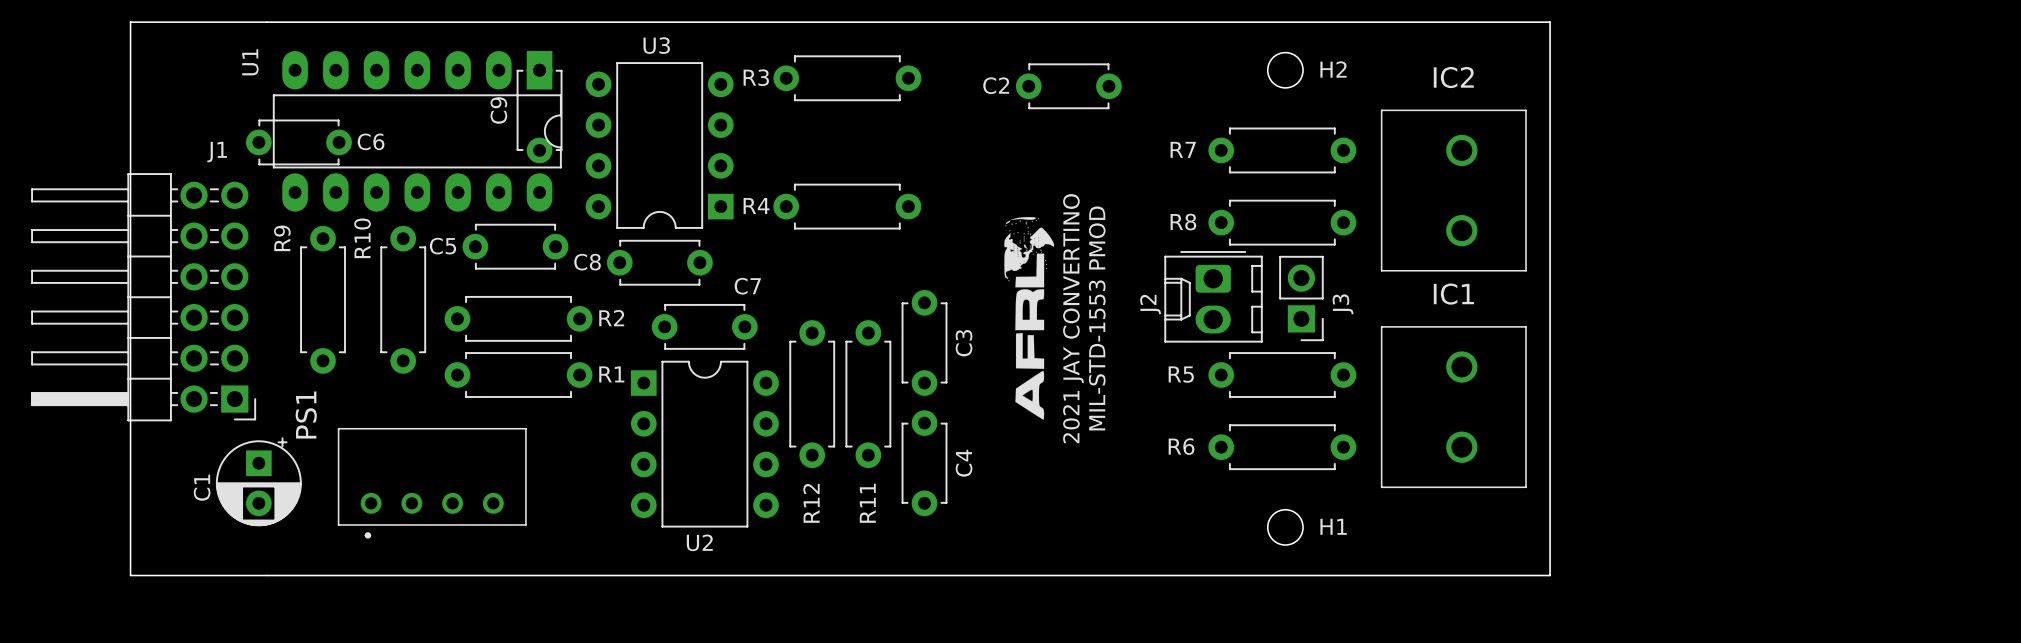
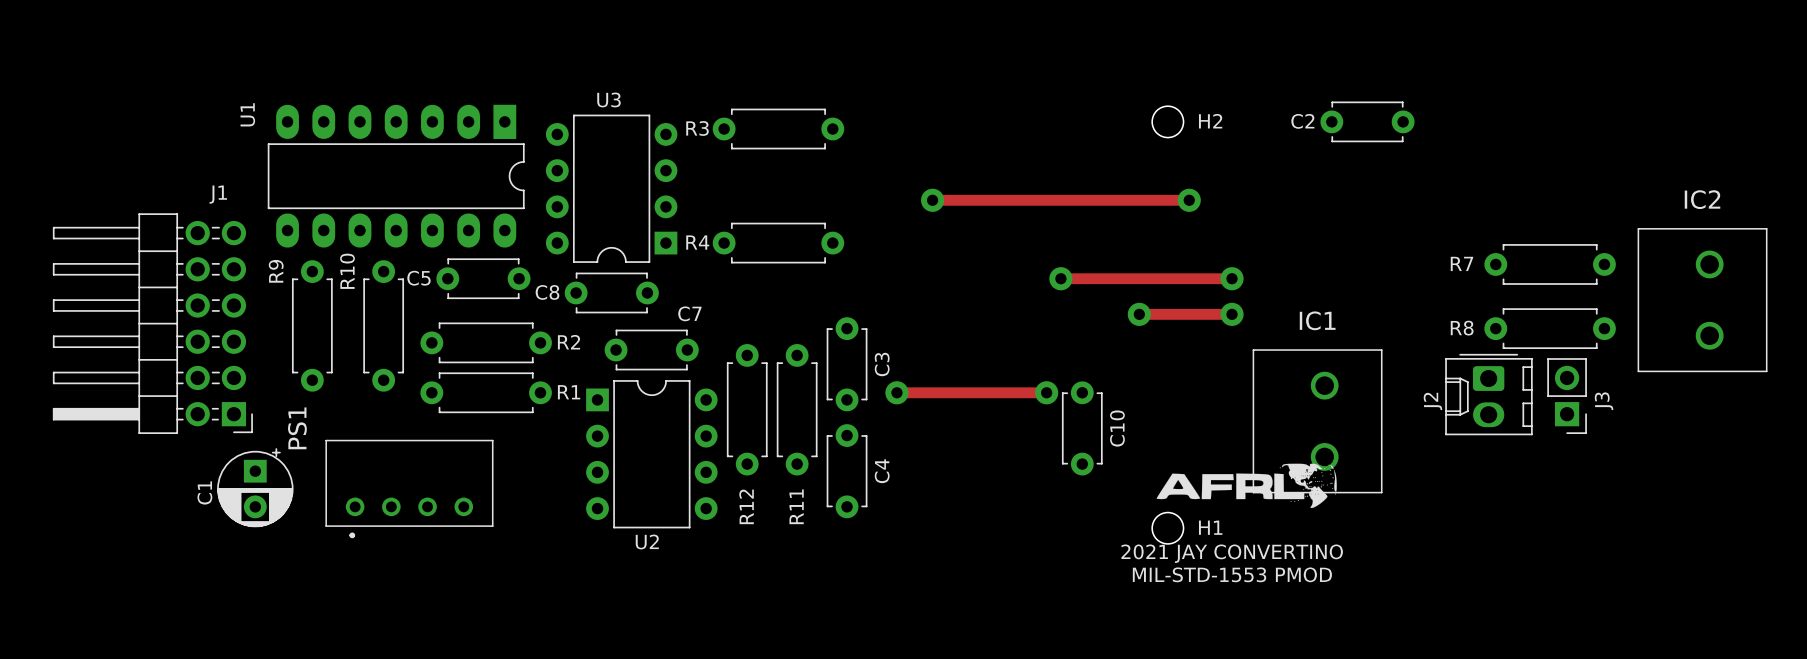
board edge: (130, 22) (130, 575) (1550, 575) (1550, 22) (130, 22) -> none
C2 position: (1068, 86) -> (1367, 121)
C9: (539, 110) -> none
C6: (298, 142) -> none
R7 position: (1282, 150) -> (1550, 264)
track: none -> (932, 200) (1189, 200)
via: none -> (932, 200)
via: none -> (1189, 200)
IC2 position: (1453, 190) -> (1702, 300)
drawing: [1004, 217, 1055, 420] -> none
R8 position: (1282, 222) -> (1550, 328)
track: none -> (1060, 278) (1232, 278)
via: none -> (1060, 278)
via: none -> (1232, 278)
track: none -> (1139, 314) (1232, 314)
via: none -> (1139, 314)
via: none -> (1232, 314)
J2 position: (1213, 296) -> (1488, 394)
J3 position: (1301, 298) -> (1567, 396)
text rotation: 0° (1073, 318) -> 90° clockwise (1232, 553)
text position: 2021 JAY CONVERTINO (1073, 318) -> 2021 JAY CONVERTINO (1232, 553)
text rotation: 0° (1097, 318) -> 90° clockwise (1232, 574)
text position: MIL-STD-1553 PMOD (1097, 318) -> MIL-STD-1553 PMOD (1232, 574)
track: none -> (896, 392) (1046, 392)
via: none -> (896, 392)
via: none -> (1046, 392)
R5: (1282, 375) -> none
C10: none -> (1082, 428)
R6: (1282, 447) -> none
drawing: none -> [1156, 463, 1337, 509]

